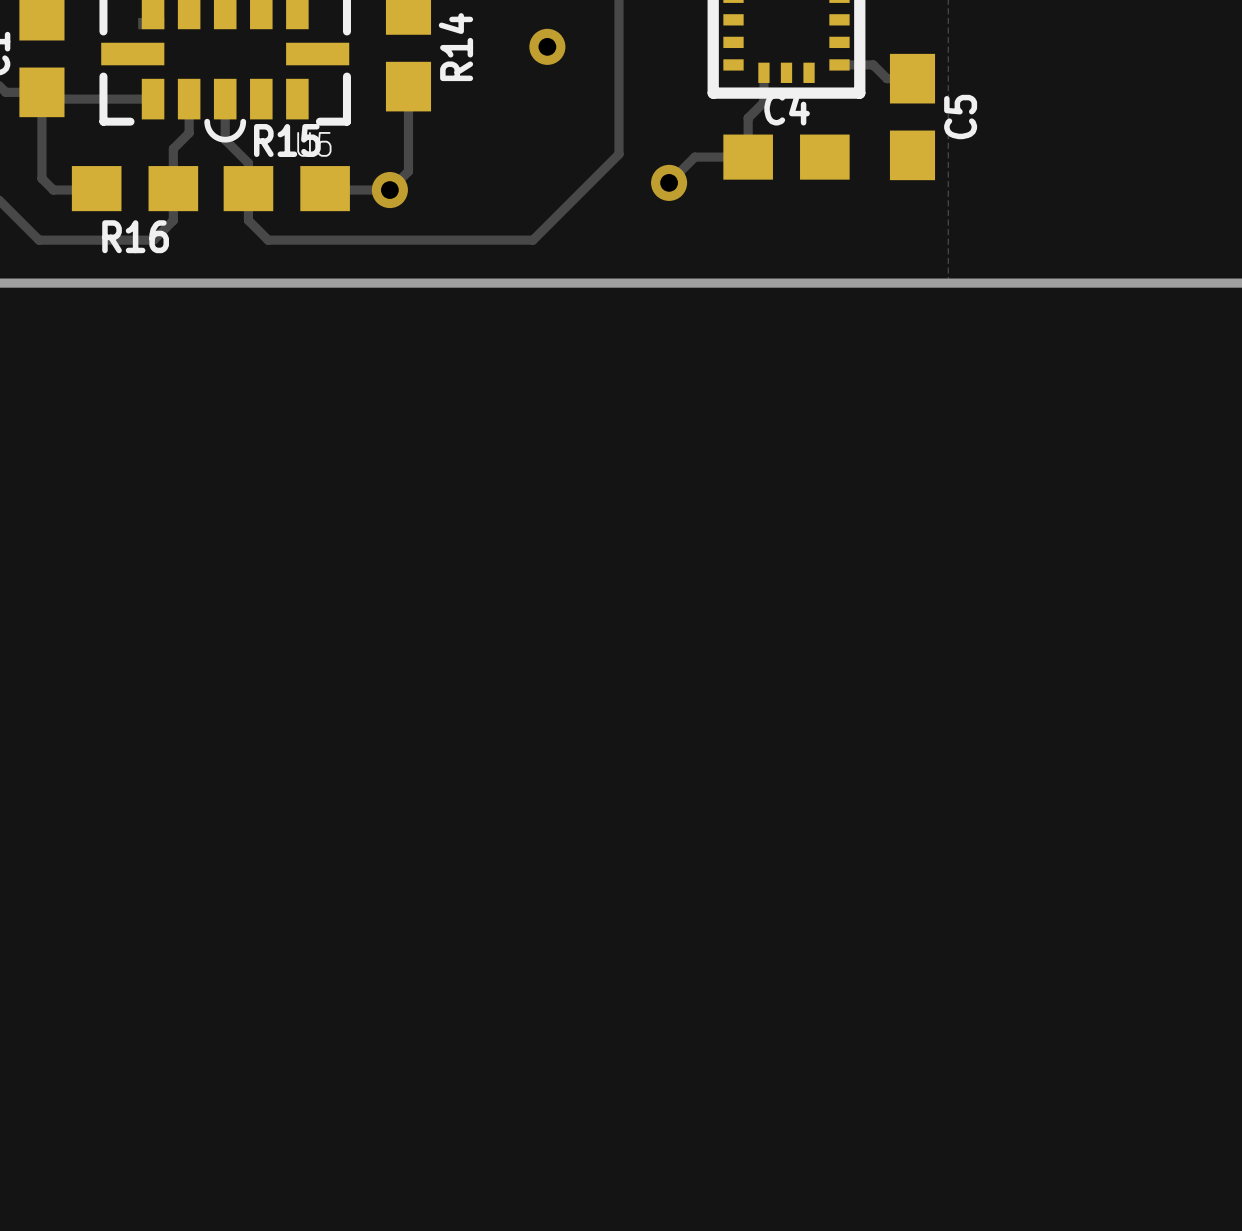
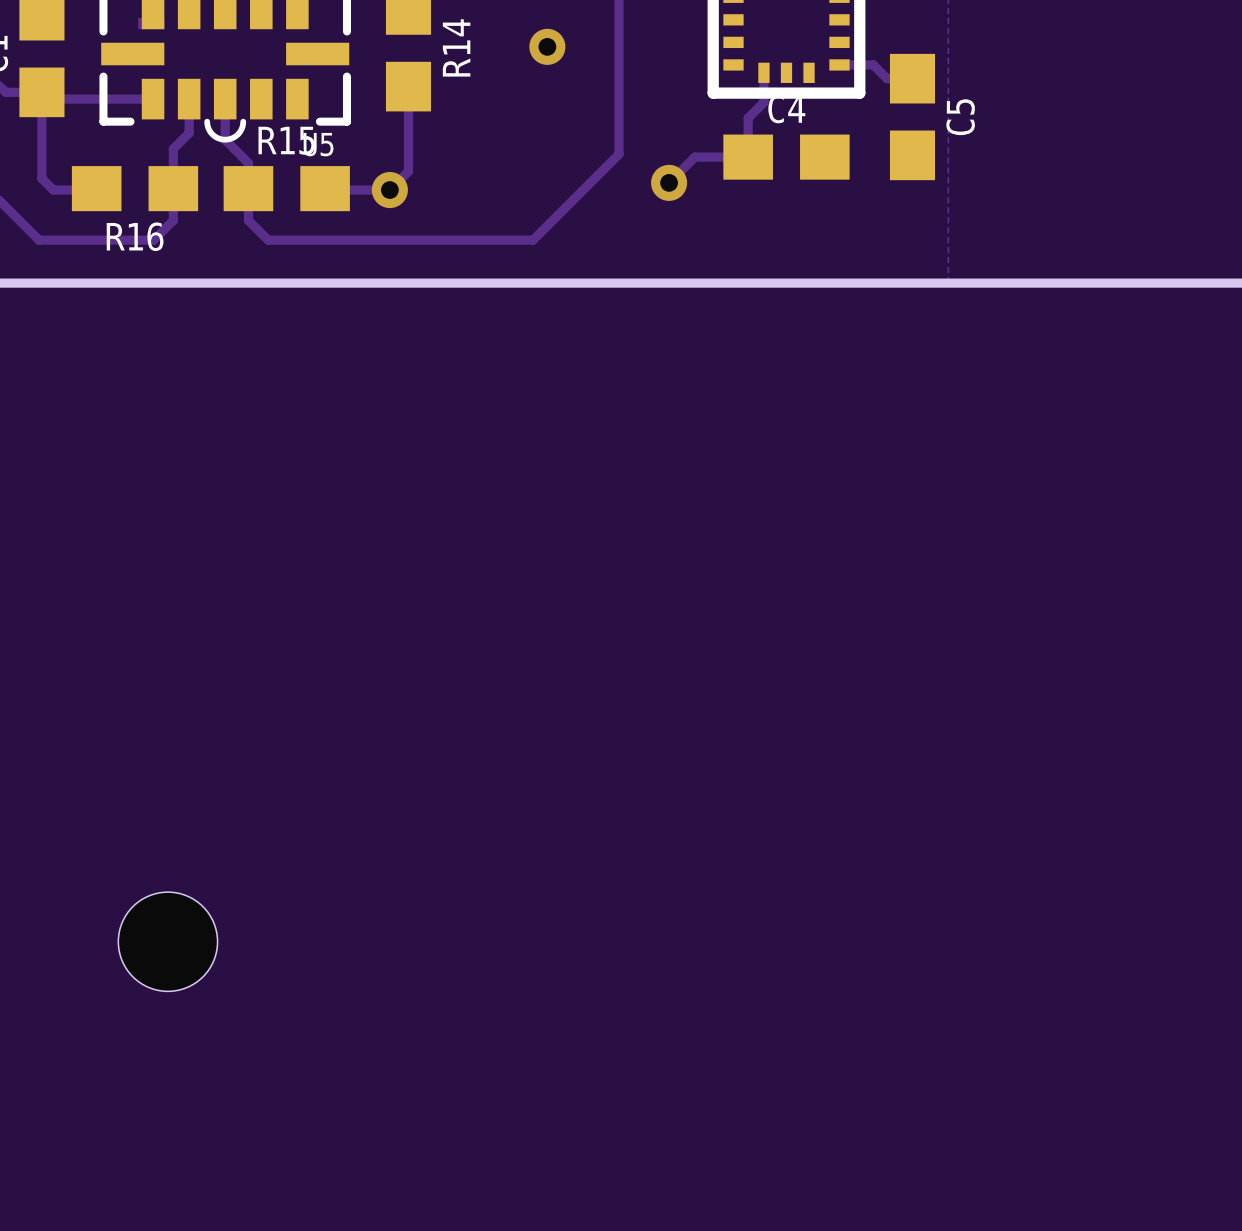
hole: none -> (167, 941)

